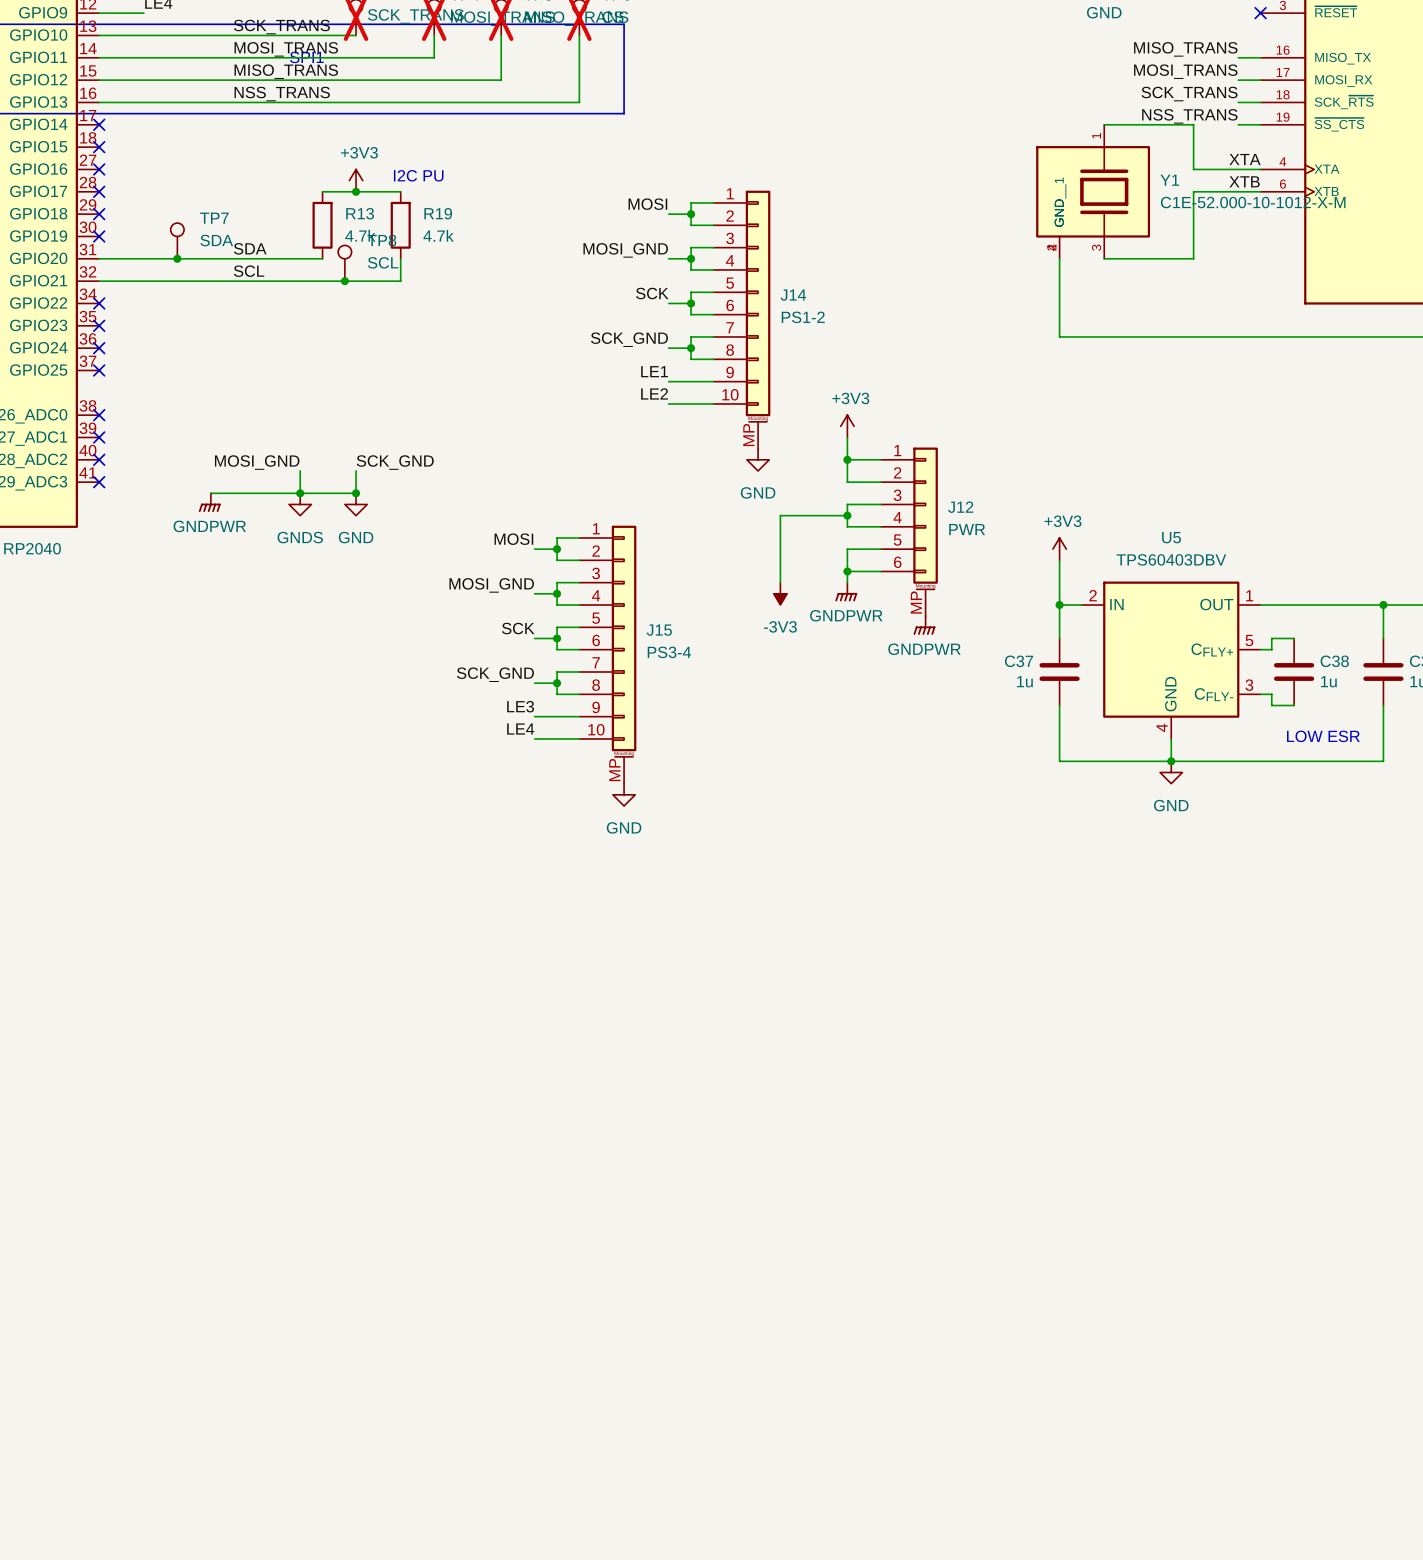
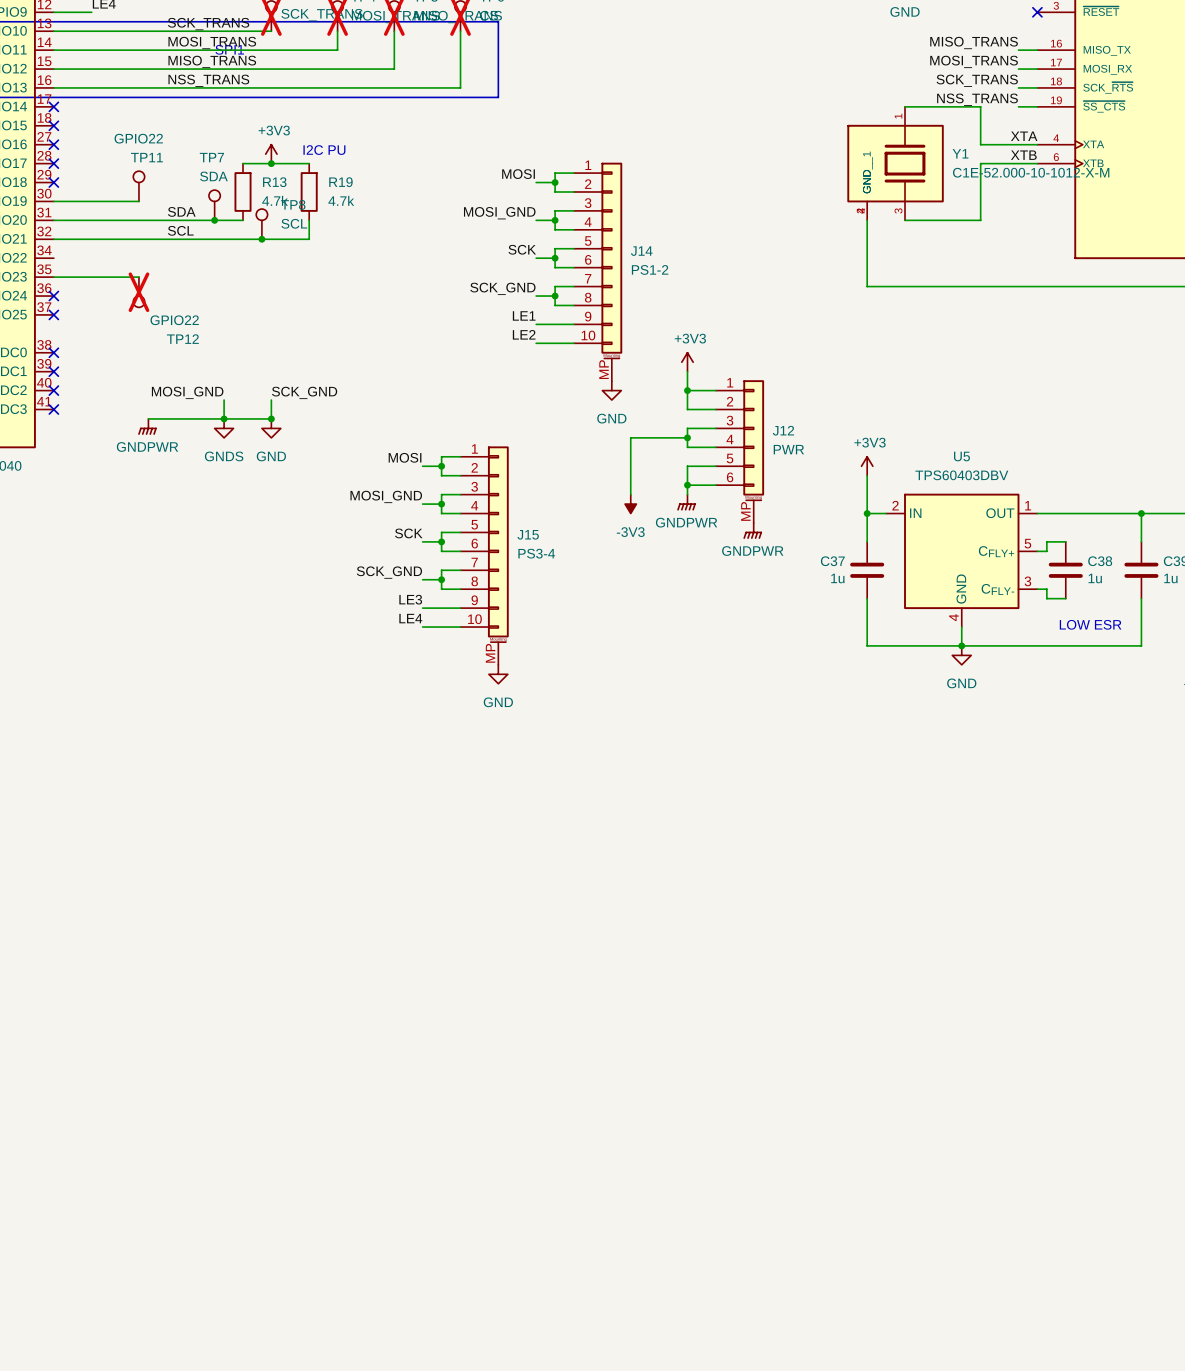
TP11: none -> GPIO22 (138, 186)
TP7 name position: TP7 (214, 218) -> TP7 (211, 157)
wire: none -> (53, 201) (138, 201)
no-connect mark: (99, 236) -> none
TP7 position: (177, 240) -> (214, 205)
TP7 value position: SDA (216, 240) -> SDA (213, 176)
junction: (177, 258) -> none
junction: none -> (214, 220)
no-connect mark: (99, 303) -> none
wire: none -> (53, 277) (138, 277)
no-connect mark: (99, 325) -> none
TP12: none -> GPIO22 (138, 292)

